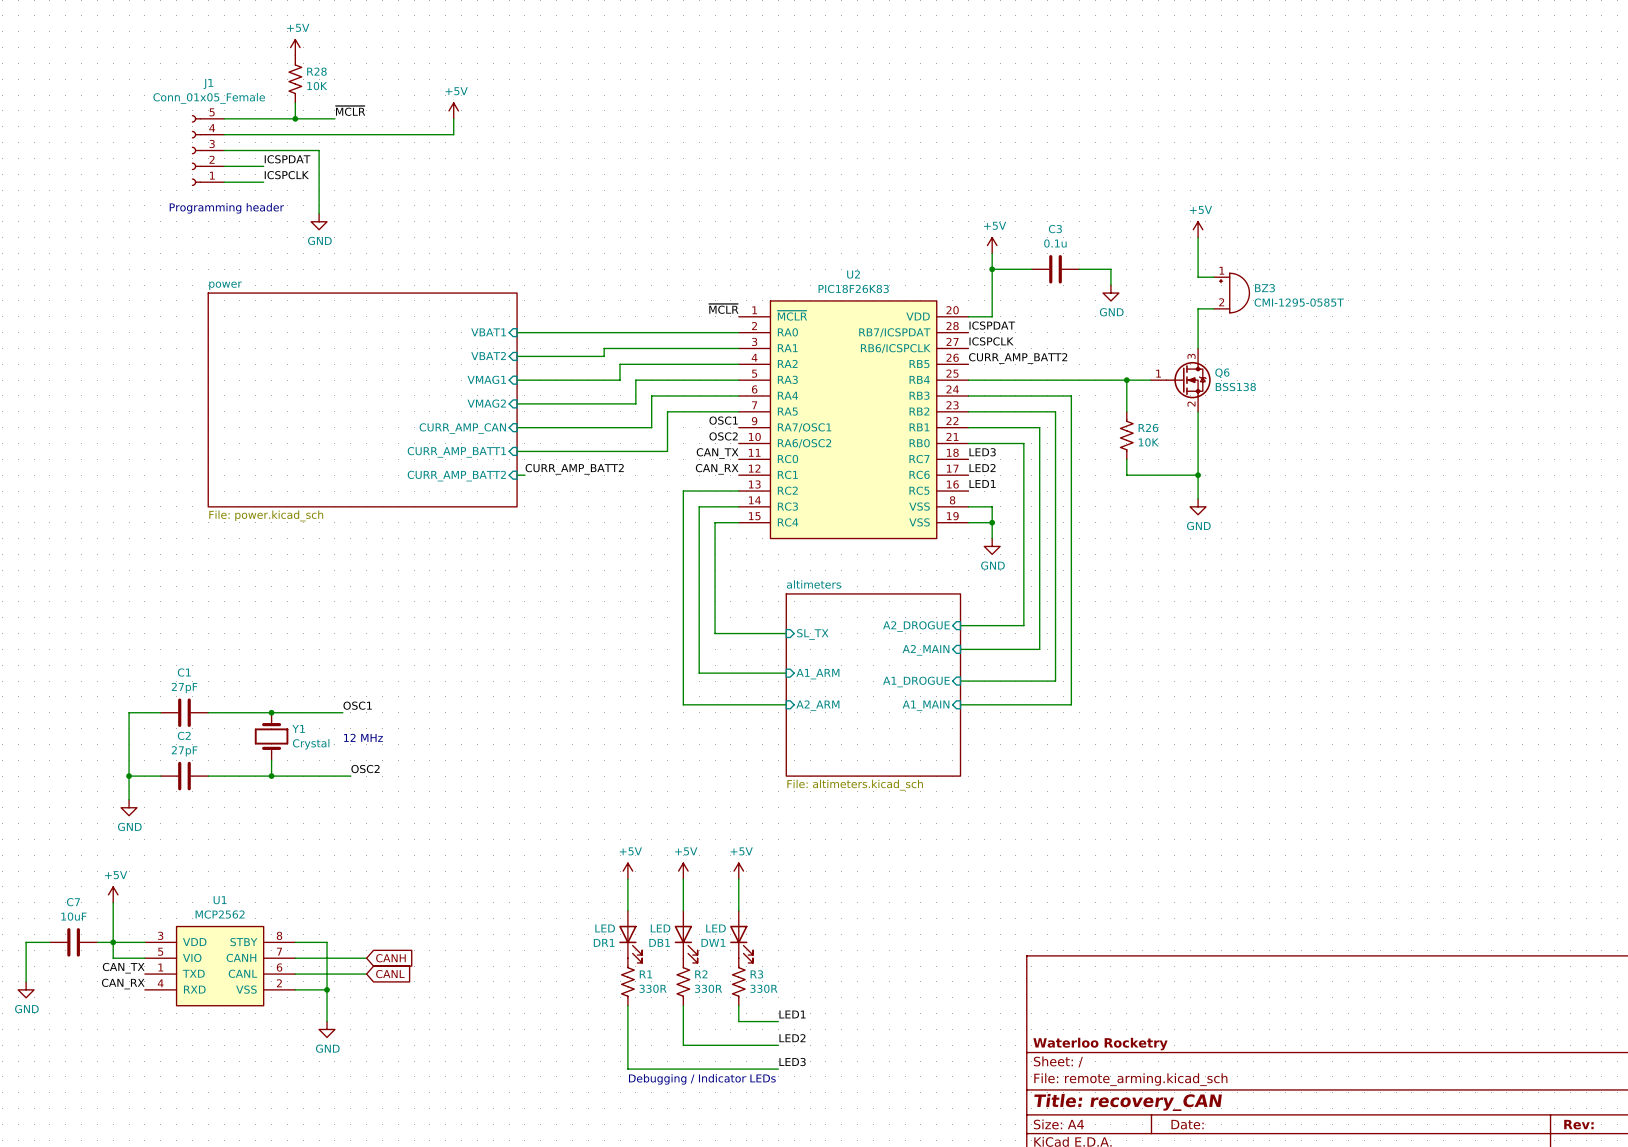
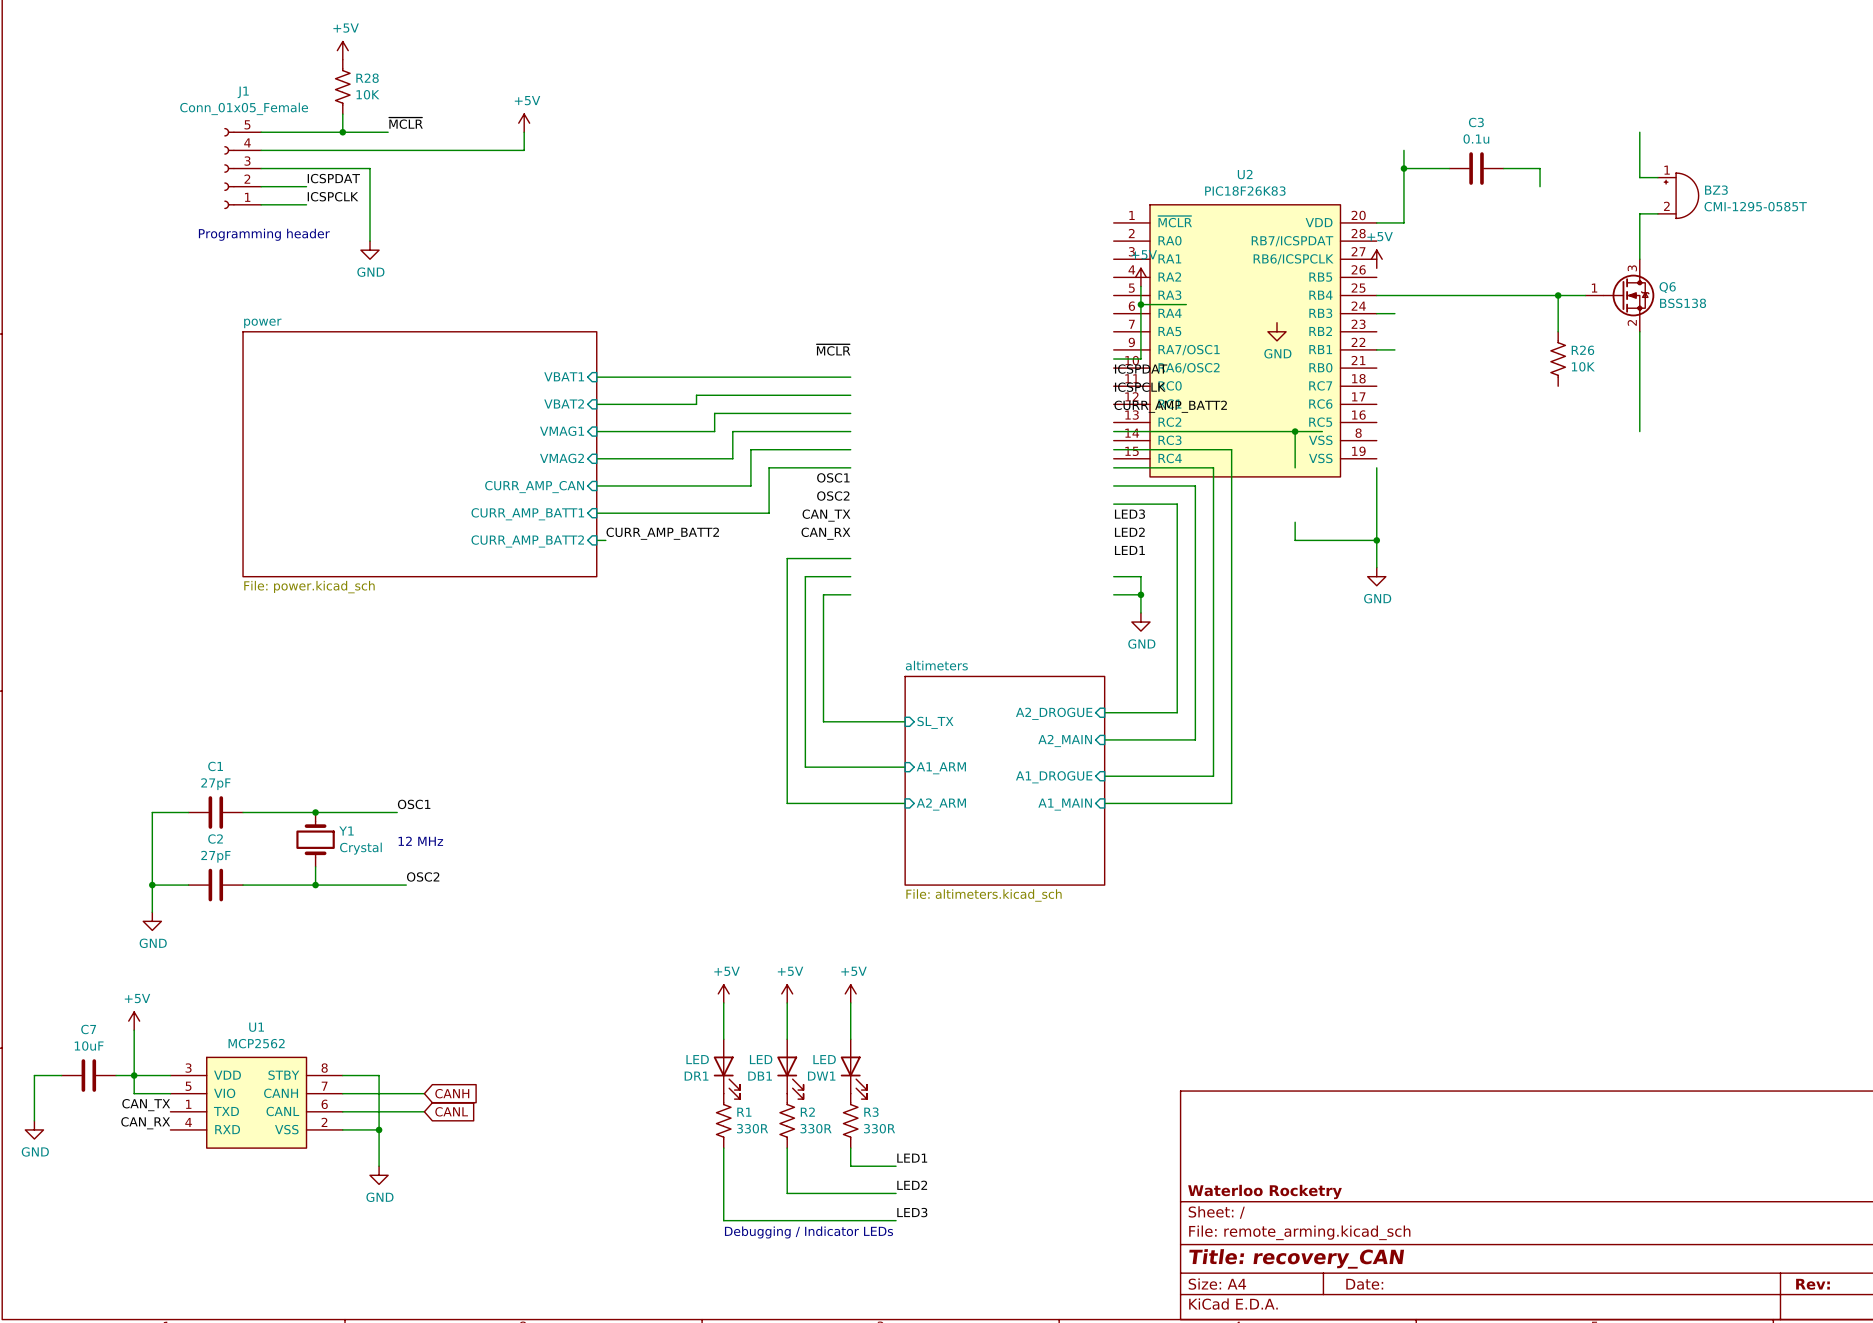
wire: none -> (1639, 132) (1639, 177) (1657, 177)
wire: none -> (1403, 150) (1403, 222) (1376, 222)
wire: none -> (1403, 168) (1449, 168)
junction: none -> (1403, 168)
wire: none -> (1503, 168) (1540, 168) (1540, 186)
wire: none -> (1657, 213) (1639, 213) (1639, 259)
wire: (1198, 237) (1198, 277) -> none
wire: none -> (1376, 295) (1585, 295)
wire: none -> (1558, 295) (1558, 331)
junction: none -> (1558, 295)
C3 position: (1055, 269) -> (1476, 168)
BZ3 position: (1231, 293) -> (1678, 195)
wire: none -> (1639, 331) (1639, 431)
wire: (1198, 308) (1198, 348) -> none
Q6 position: (1180, 380) -> (1619, 295)
U2 position: (853, 419) -> (1245, 340)
R26 position: (1126, 435) -> (1558, 359)

